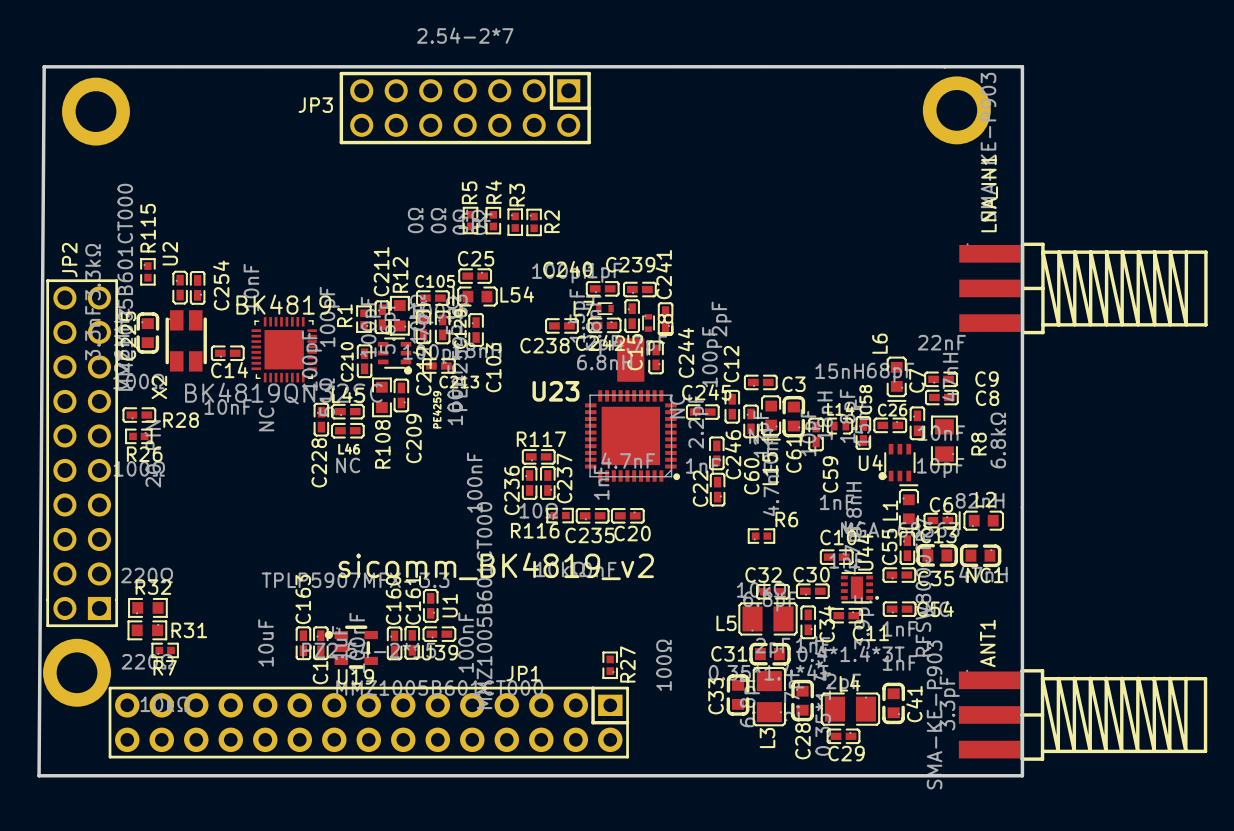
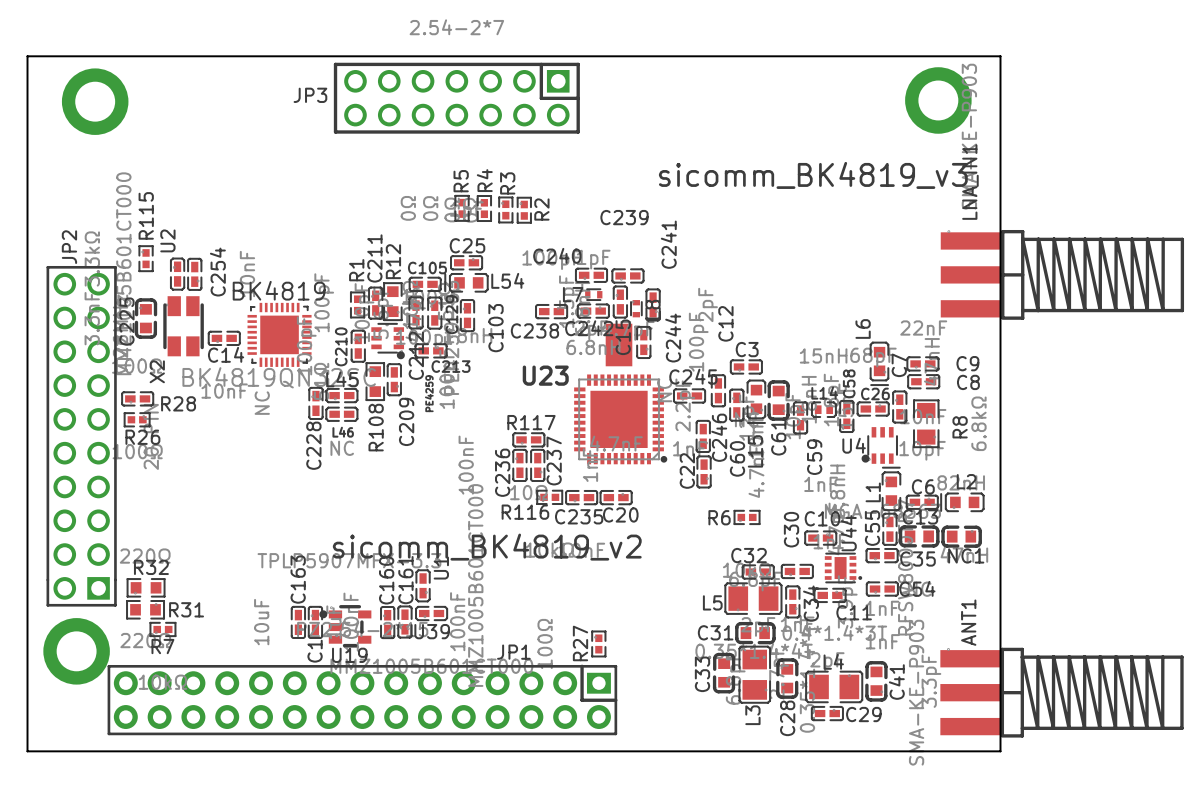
board edge: (44, 66) (39, 775) (1022, 775) (1022, 66) (44, 66) -> (27, 56) (27, 751) (1000, 751) (1000, 56) (27, 56)
text: none -> sicomm_BK4819_v3 (813, 175)
C239 name position: C239 (630, 264) -> C239 (624, 217)
C241 name position: C241 (663, 274) -> C241 (668, 244)
R1 name position: R1 (344, 315) -> R1 (356, 270)
C12 name position: C12 (731, 364) -> C12 (725, 323)
C103 name position: C103 (493, 367) -> C103 (496, 328)
C3 name position: C3 (793, 384) -> C3 (747, 349)
R6 name position: R6 (786, 519) -> R6 (719, 517)
C30 name rotation: 0° (811, 574) -> 90° counterclockwise (791, 529)
U1 name position: U1 (450, 605) -> U1 (441, 568)
R27 rotation: 0° (610, 665) -> 180° (598, 643)
C29 name position: C29 (846, 753) -> C29 (863, 714)

